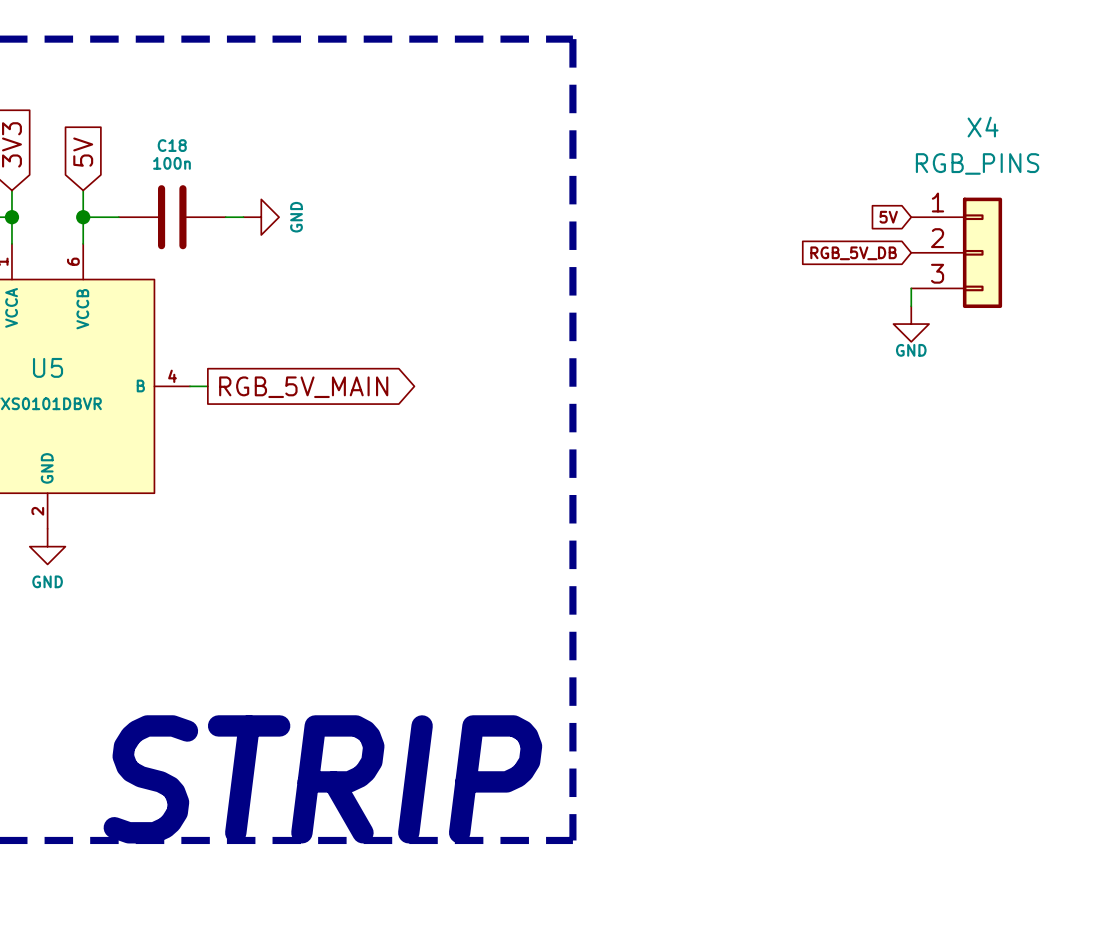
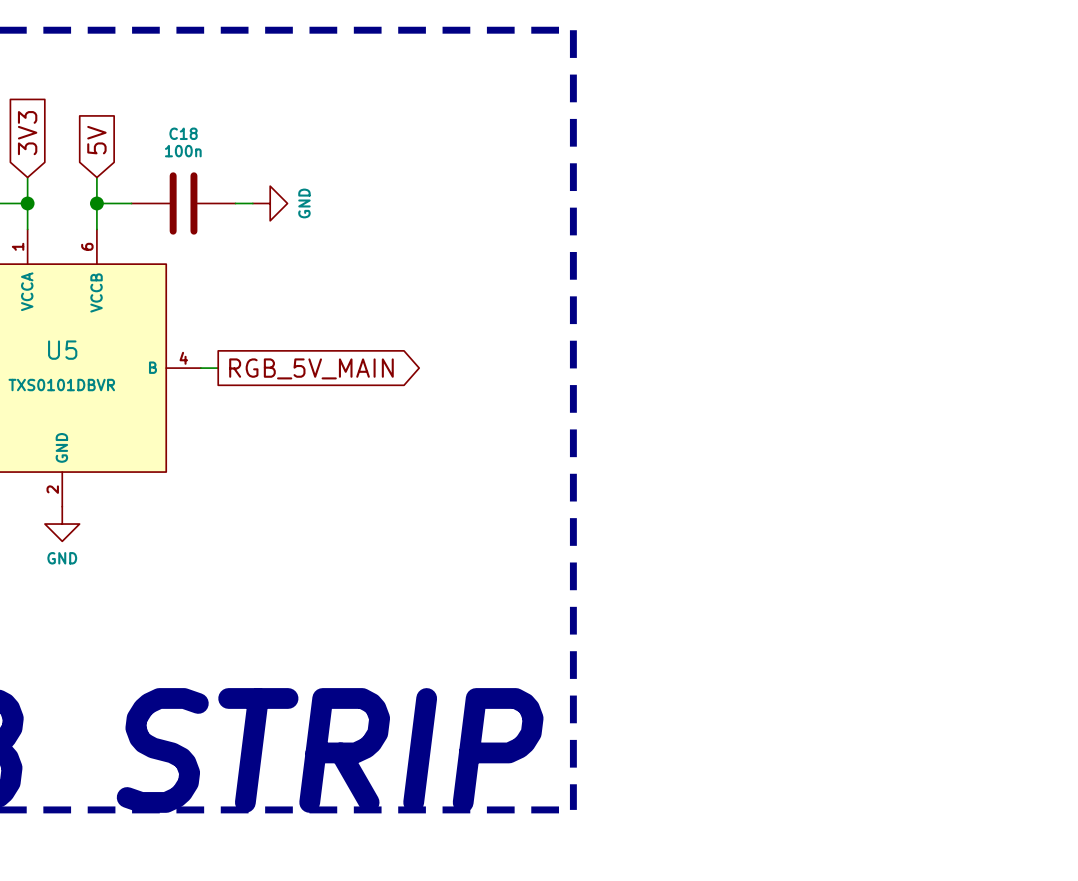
global label: 5V (888, 217) -> none
X4: RGB_PINS (956, 252) -> none
global label: RGB_5V_DB (853, 253) -> none
wire: (911, 288) (911, 306) -> none
power symbol: GND (911, 324) -> none

